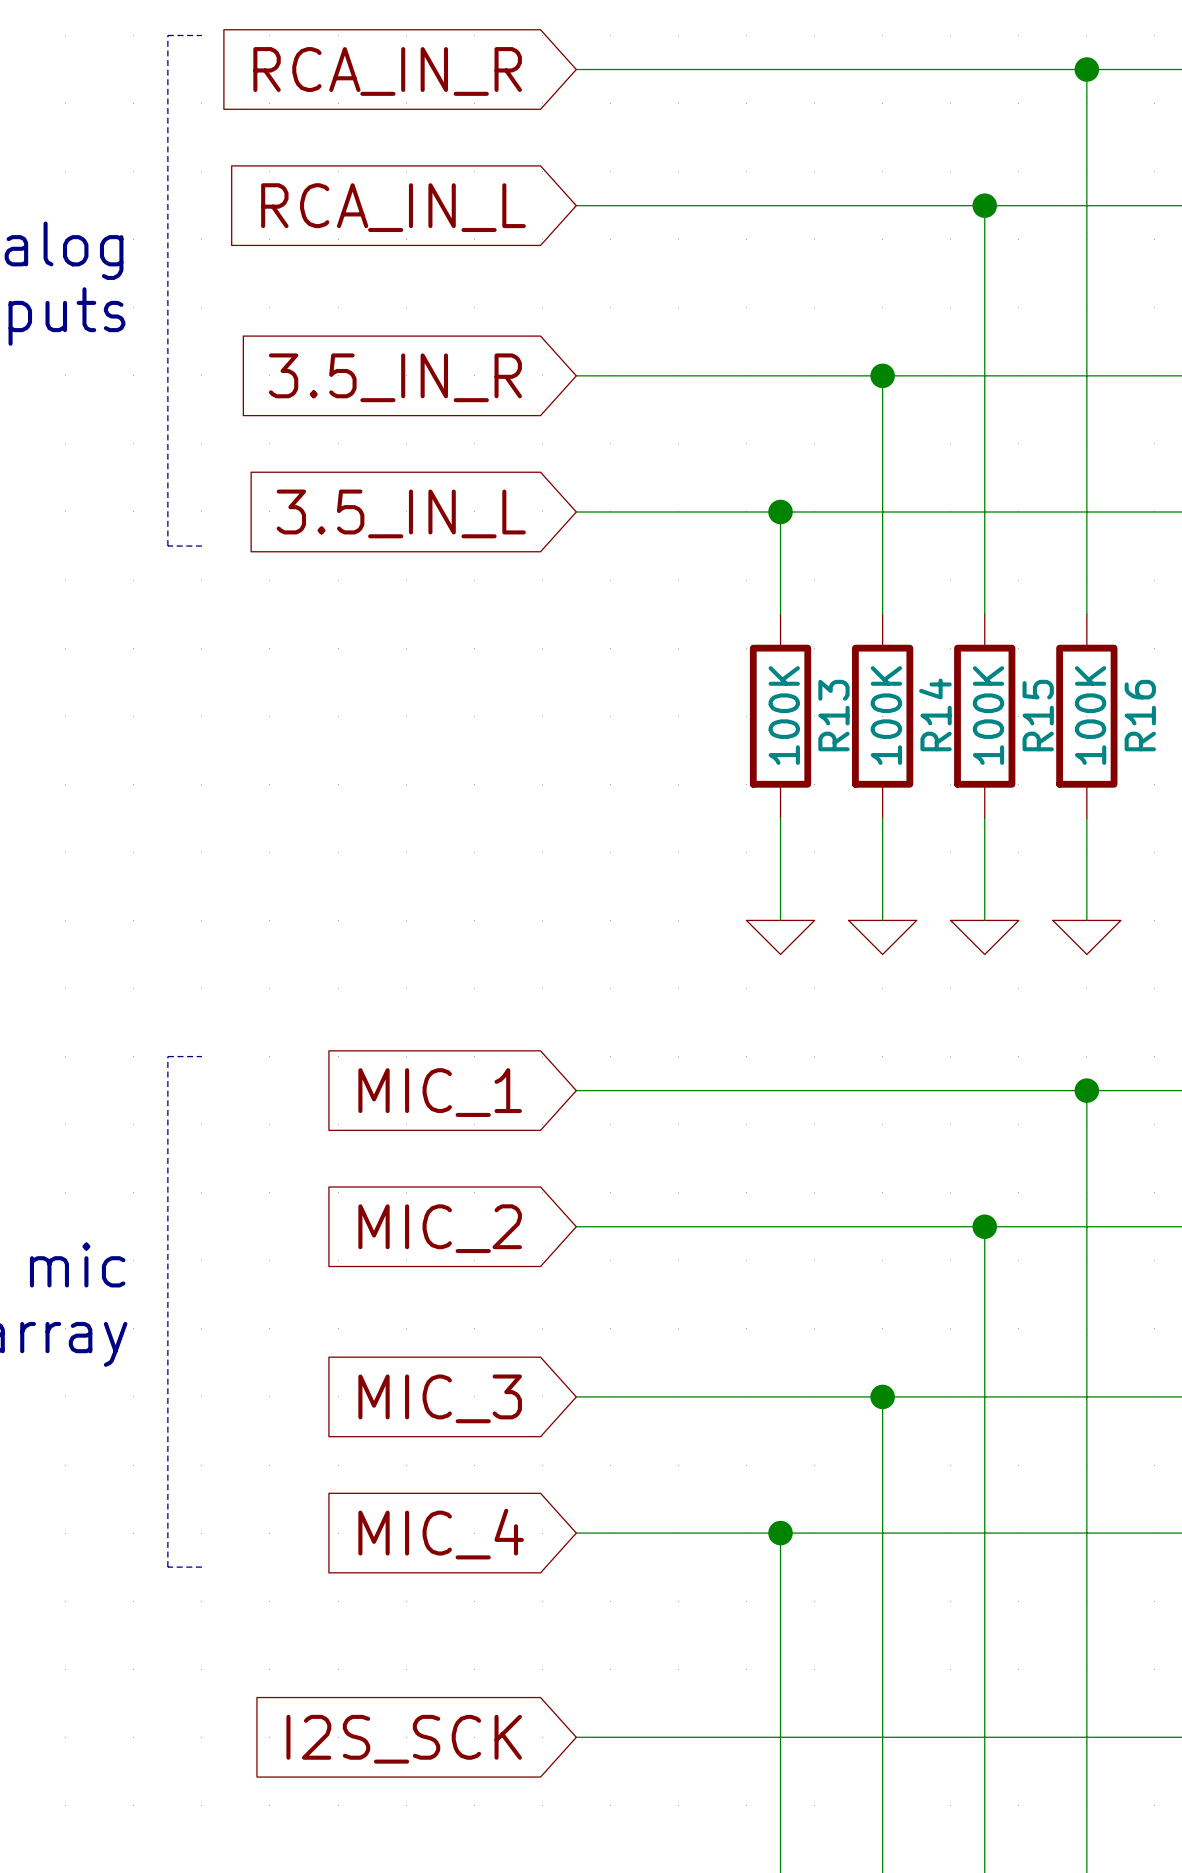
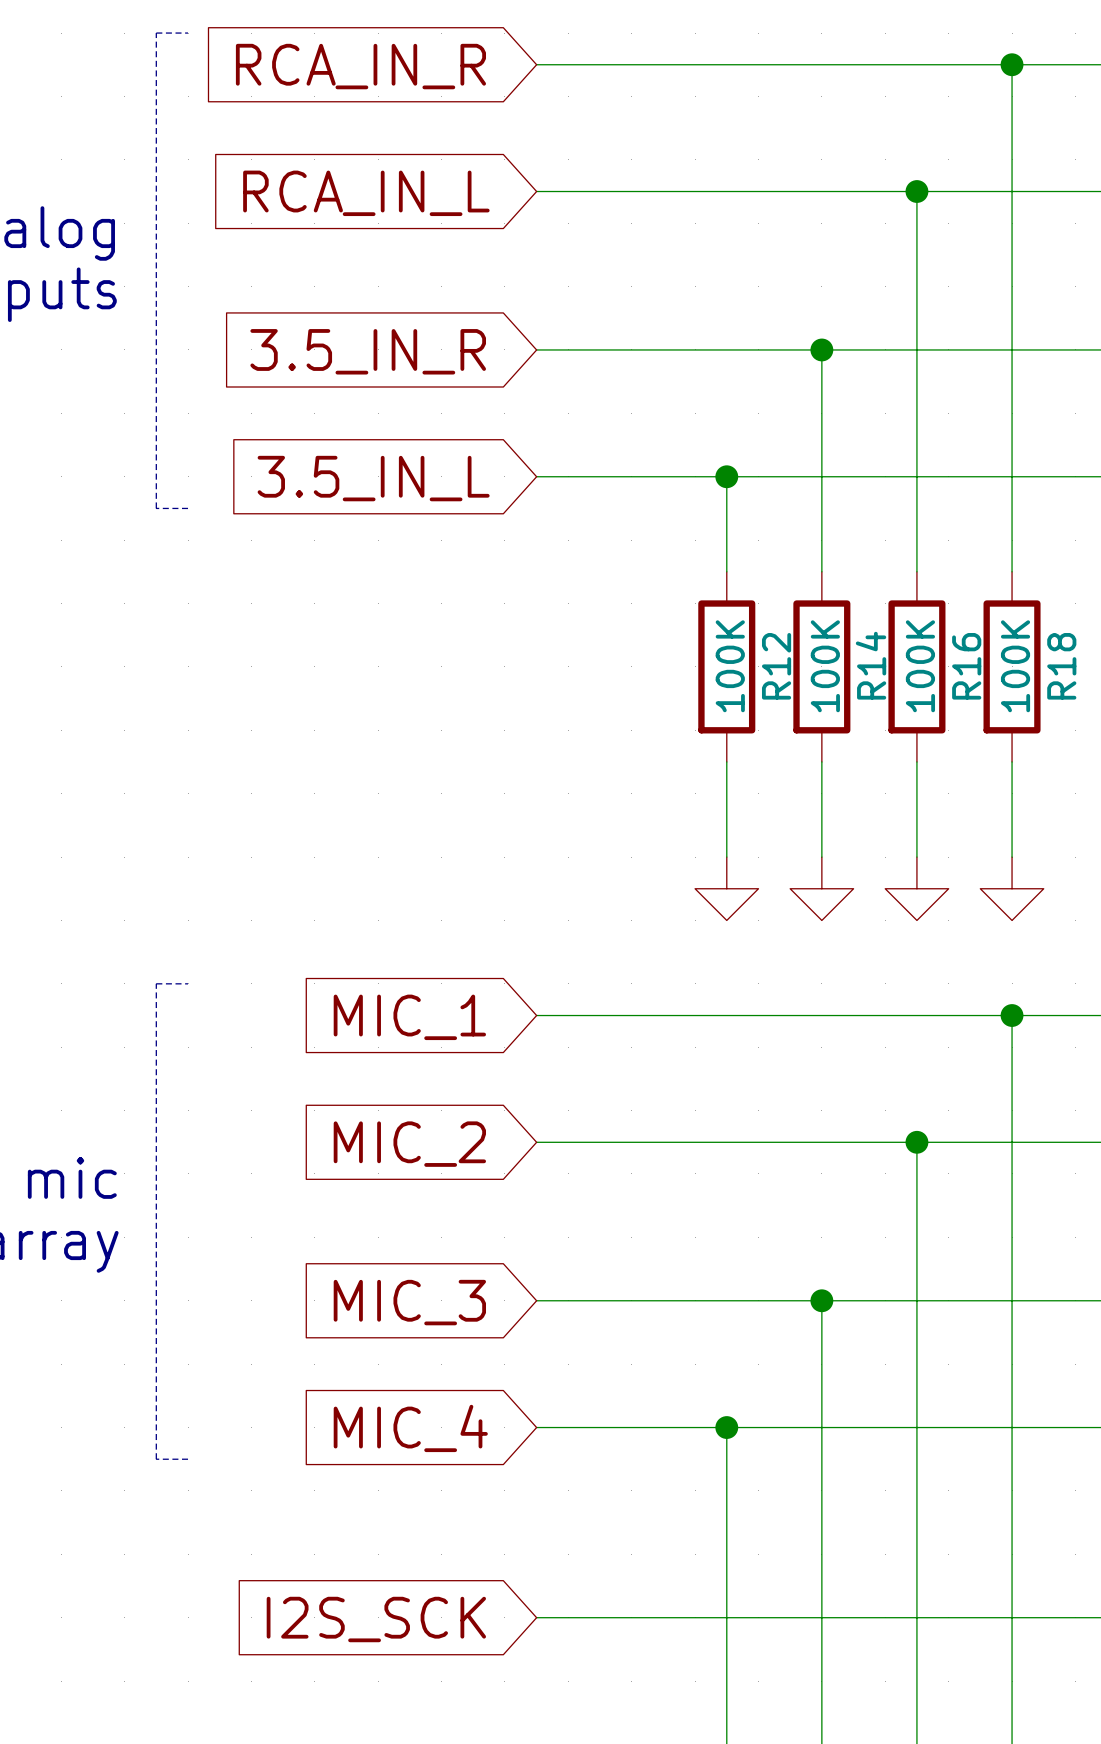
R13 name: R13 (833, 715) -> R12 (776, 666)
R15 name: R15 (1038, 715) -> R16 (966, 666)
R16 name: R16 (1140, 715) -> R18 (1061, 666)
power symbol shape: [746, 920, 815, 955] -> [695, 857, 759, 921]
power symbol shape: [848, 920, 917, 955] -> [790, 857, 854, 921]
power symbol shape: [950, 920, 1019, 955] -> [885, 857, 949, 921]
power symbol shape: [1052, 920, 1121, 955] -> [980, 857, 1044, 921]

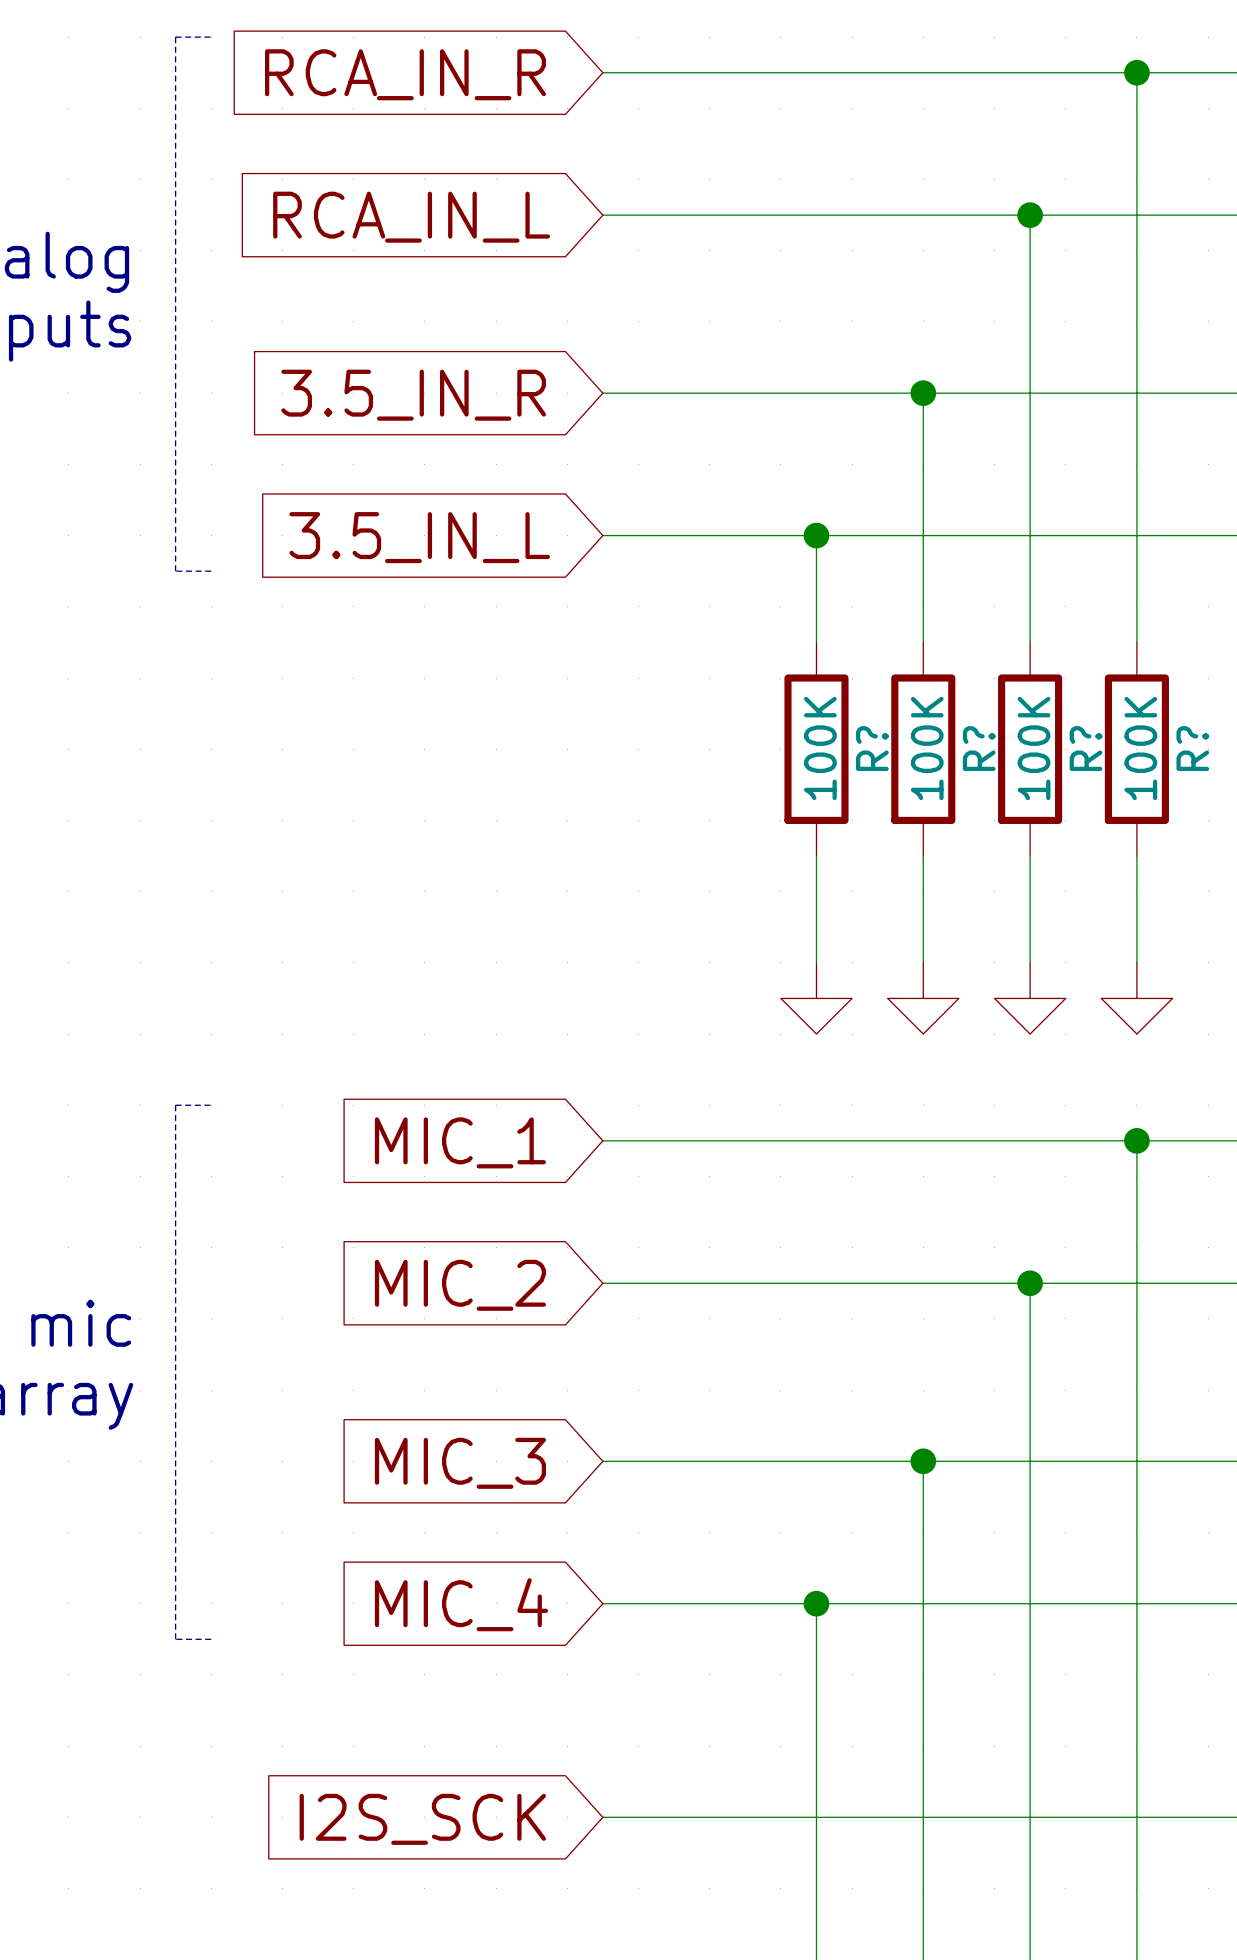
R14 name: R14 (871, 665) -> R? (979, 748)
R12 name: R12 (776, 666) -> R? (872, 748)
R16 name: R16 (966, 666) -> R? (1086, 748)
R18 name: R18 (1061, 666) -> R? (1192, 748)

